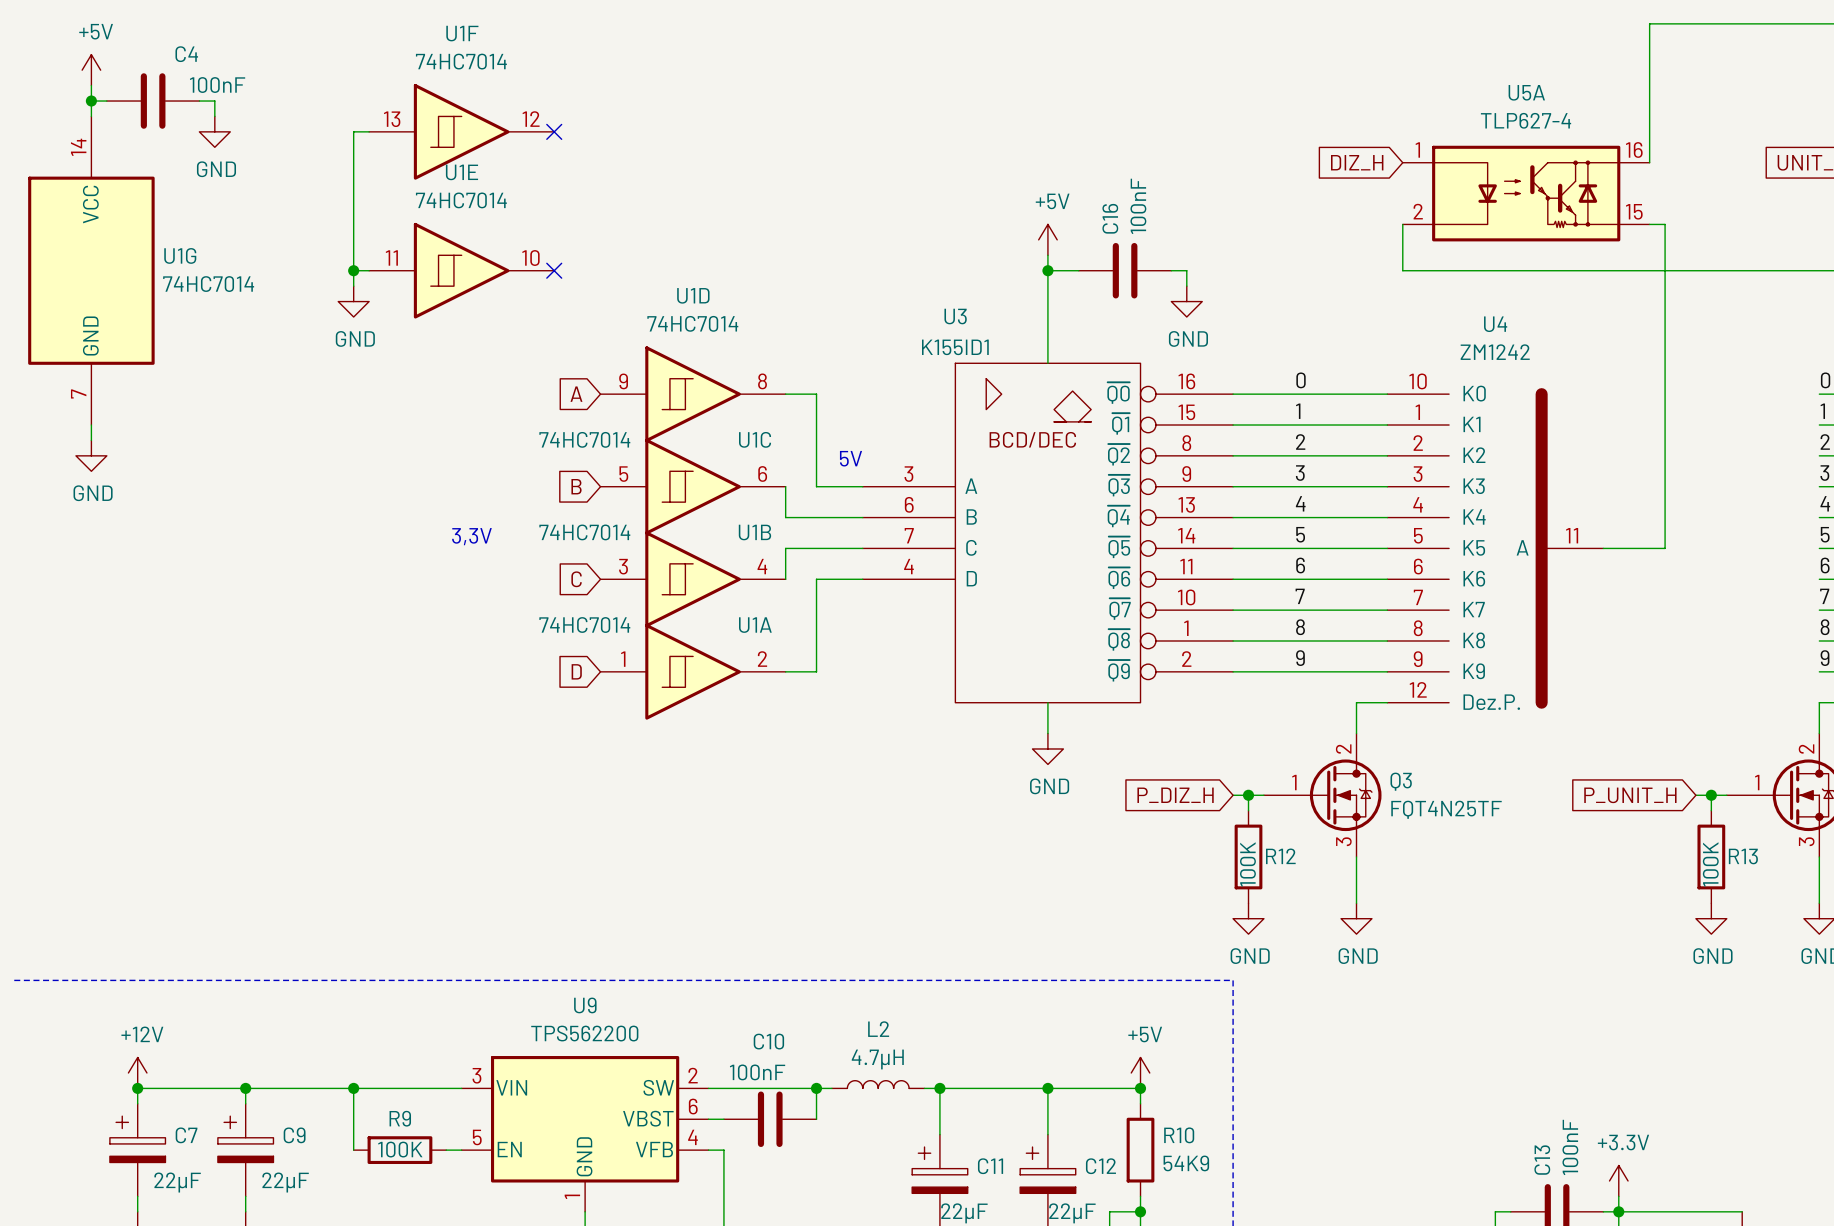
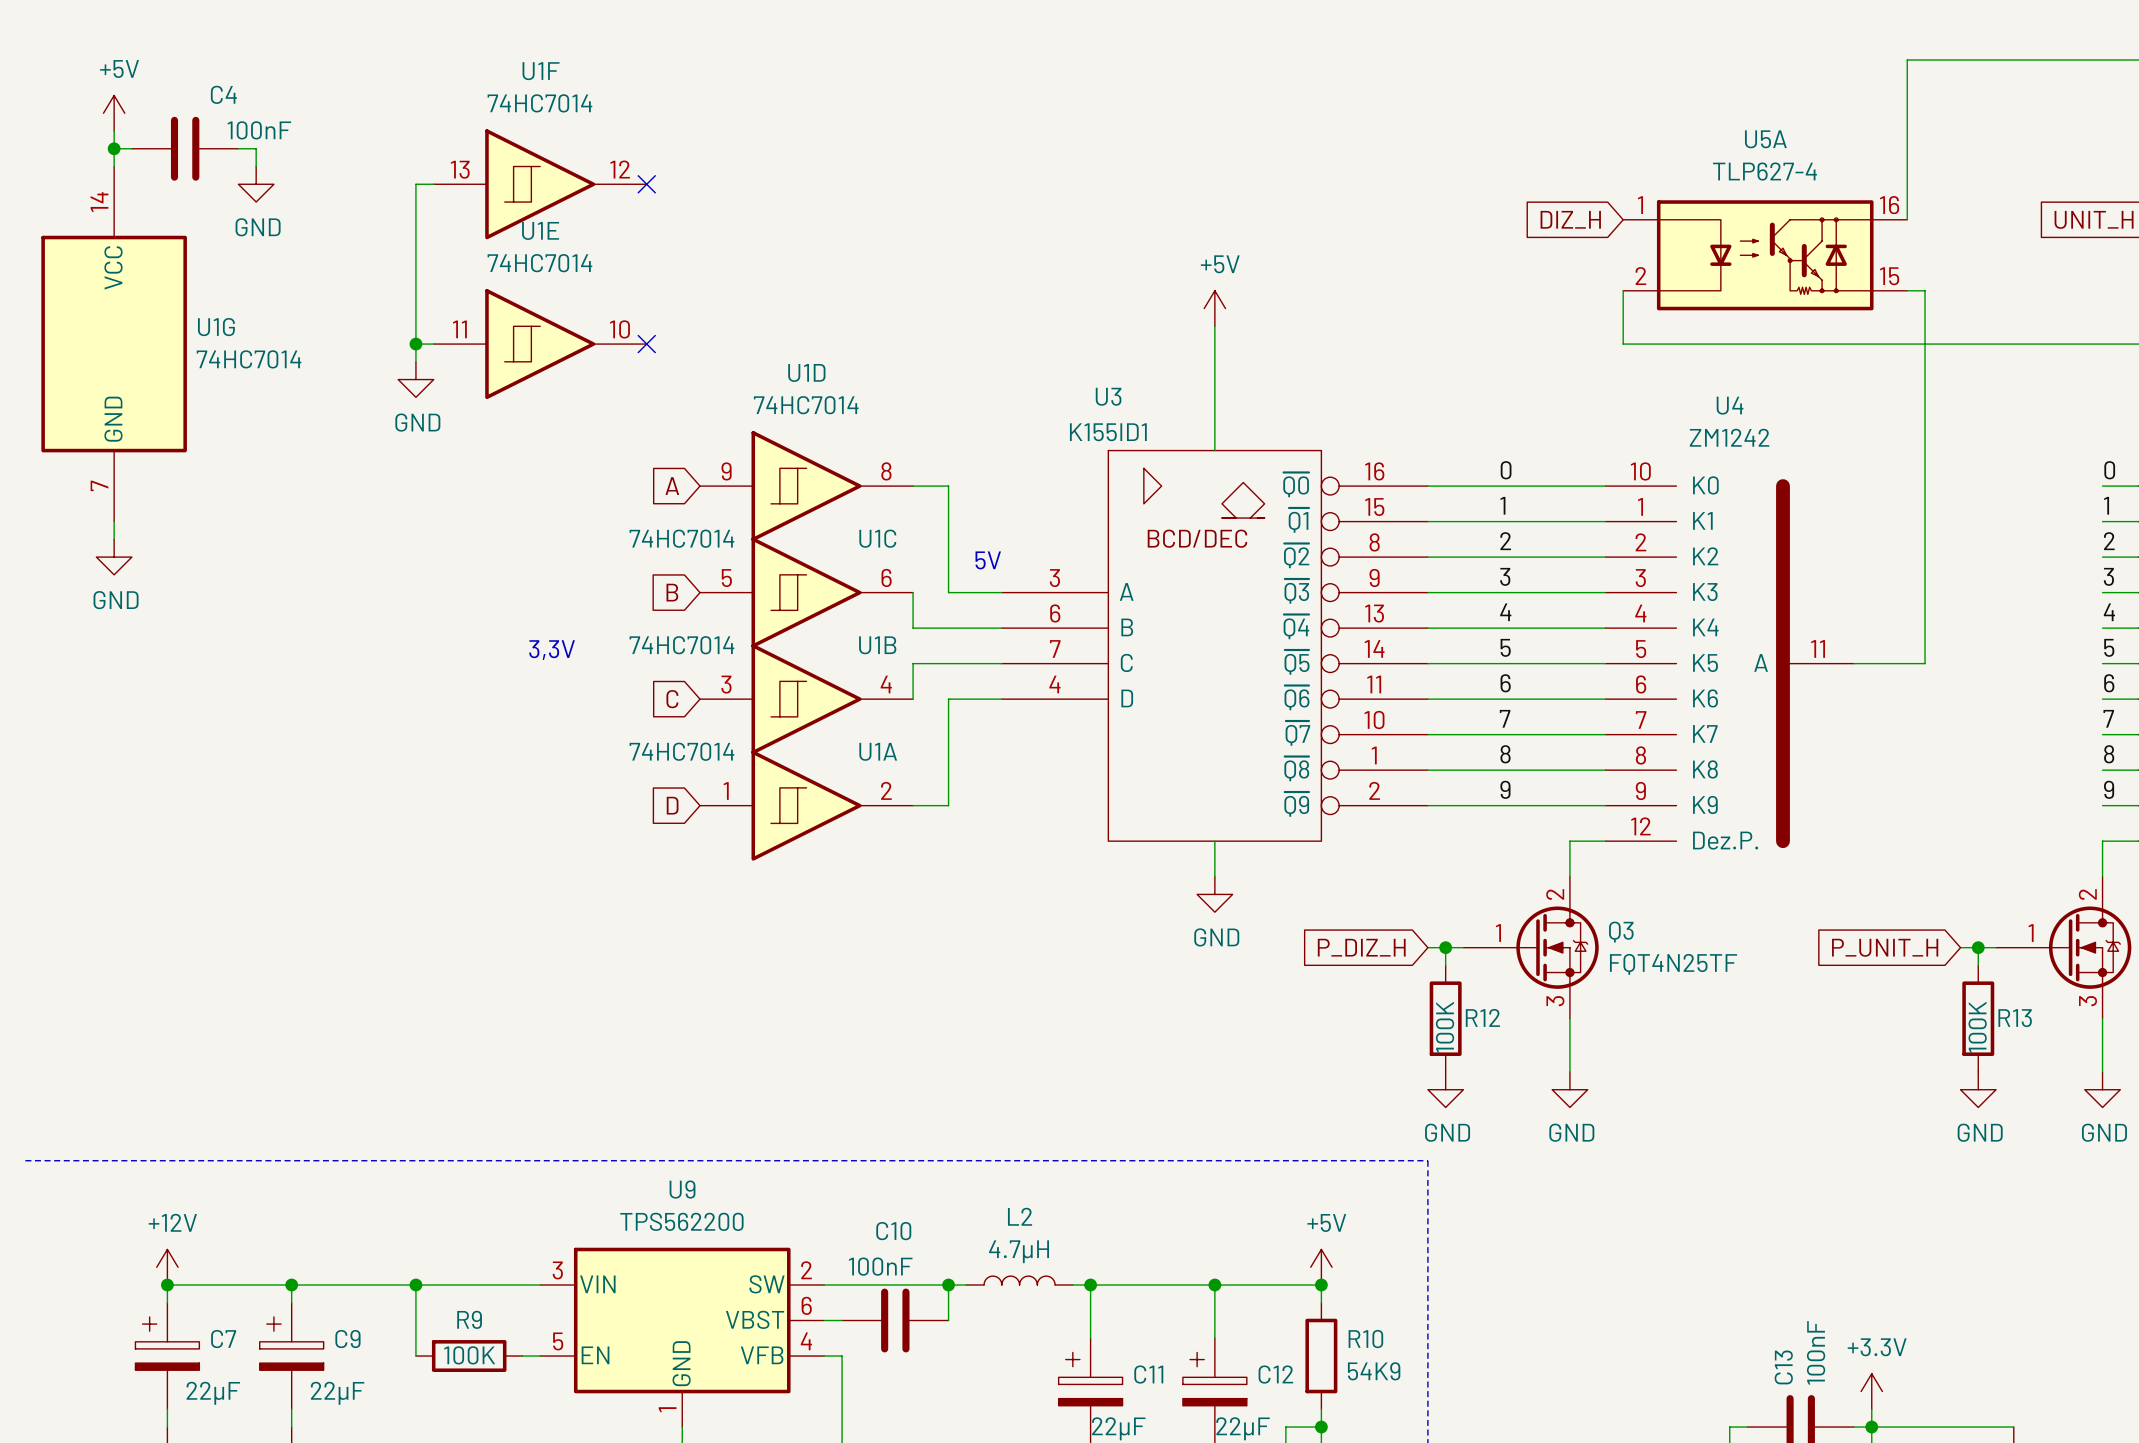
wire: (1047, 270) (1078, 270) -> none
junction: (1047, 270) -> none
C16: 100nF (1125, 270) -> none
wire: (1171, 270) (1186, 270) (1186, 286) -> none
power symbol: GND (1186, 301) -> none

